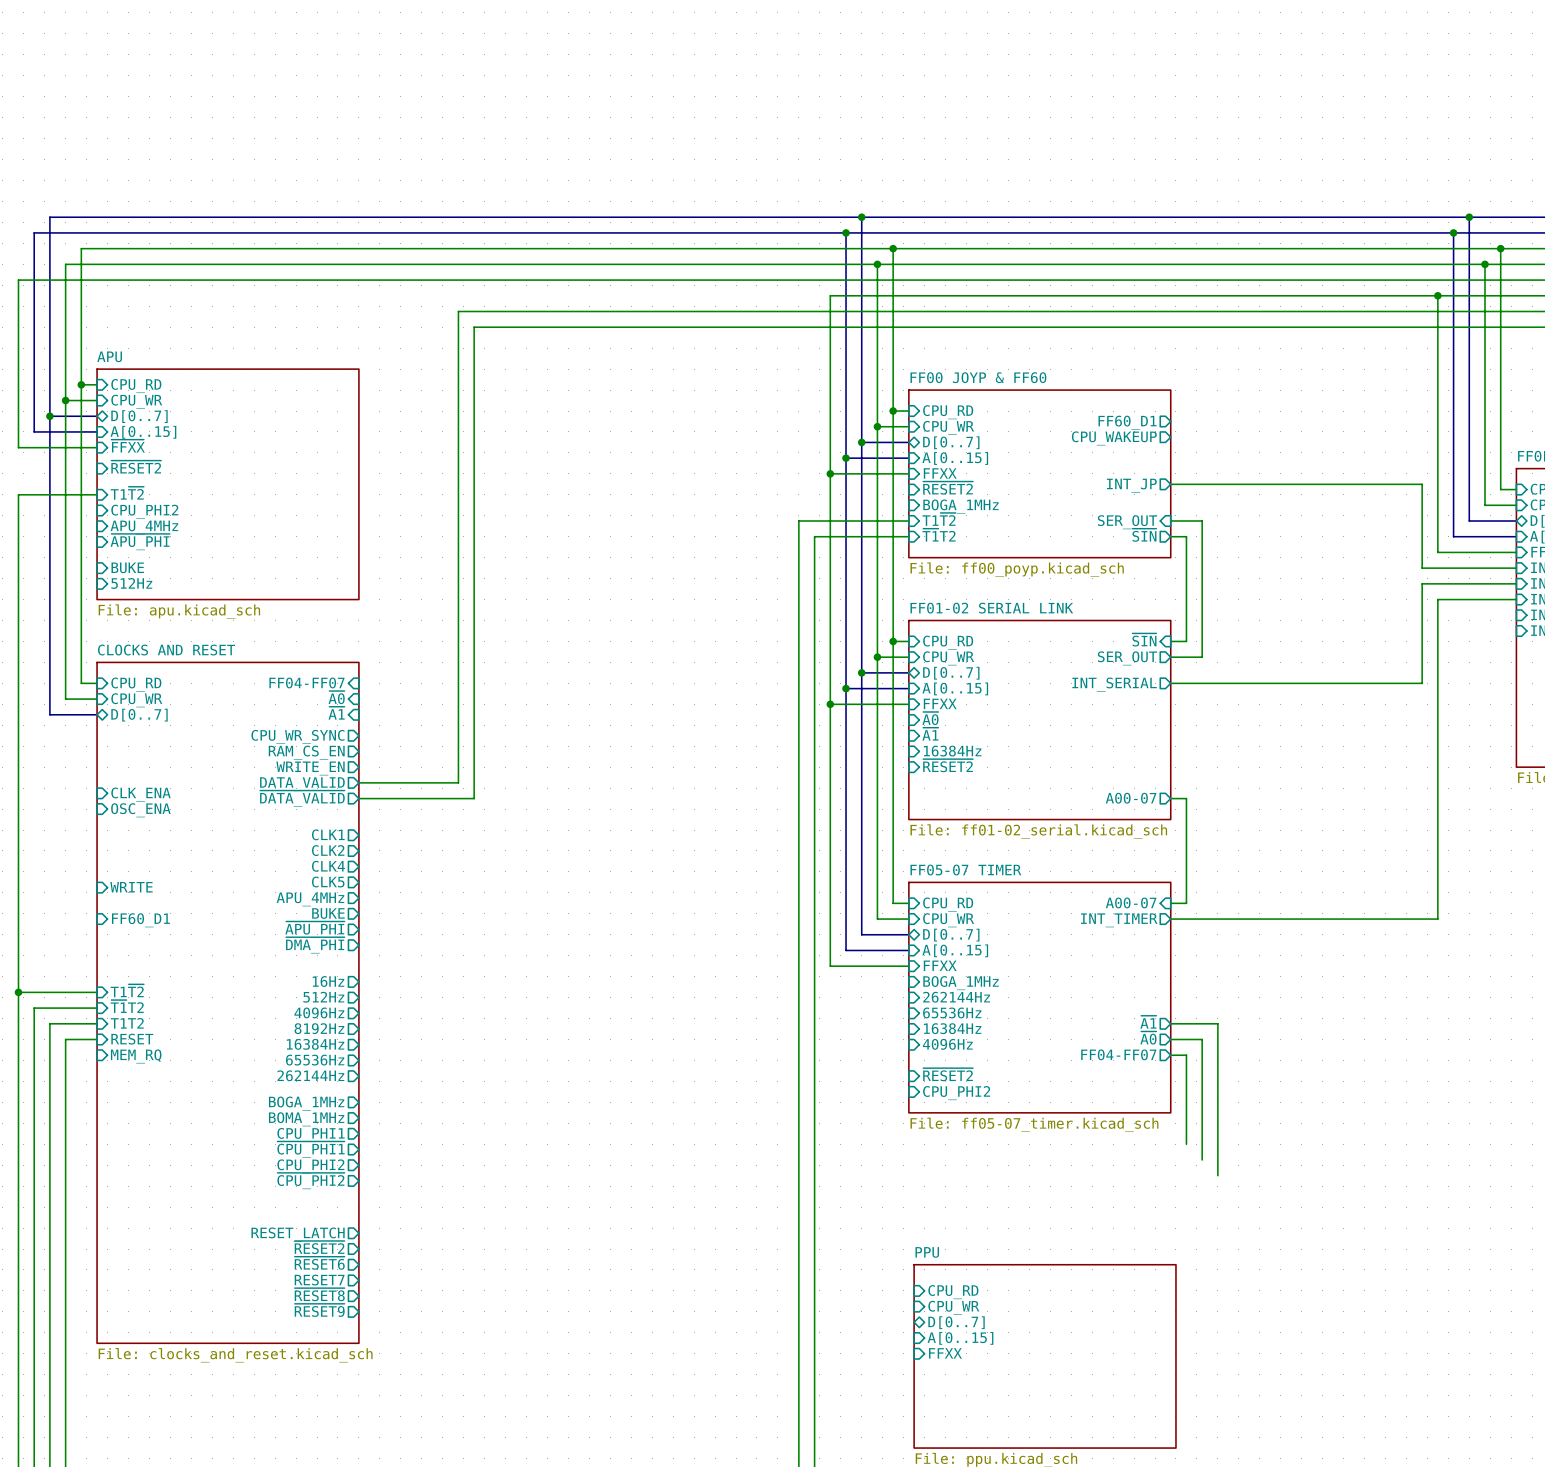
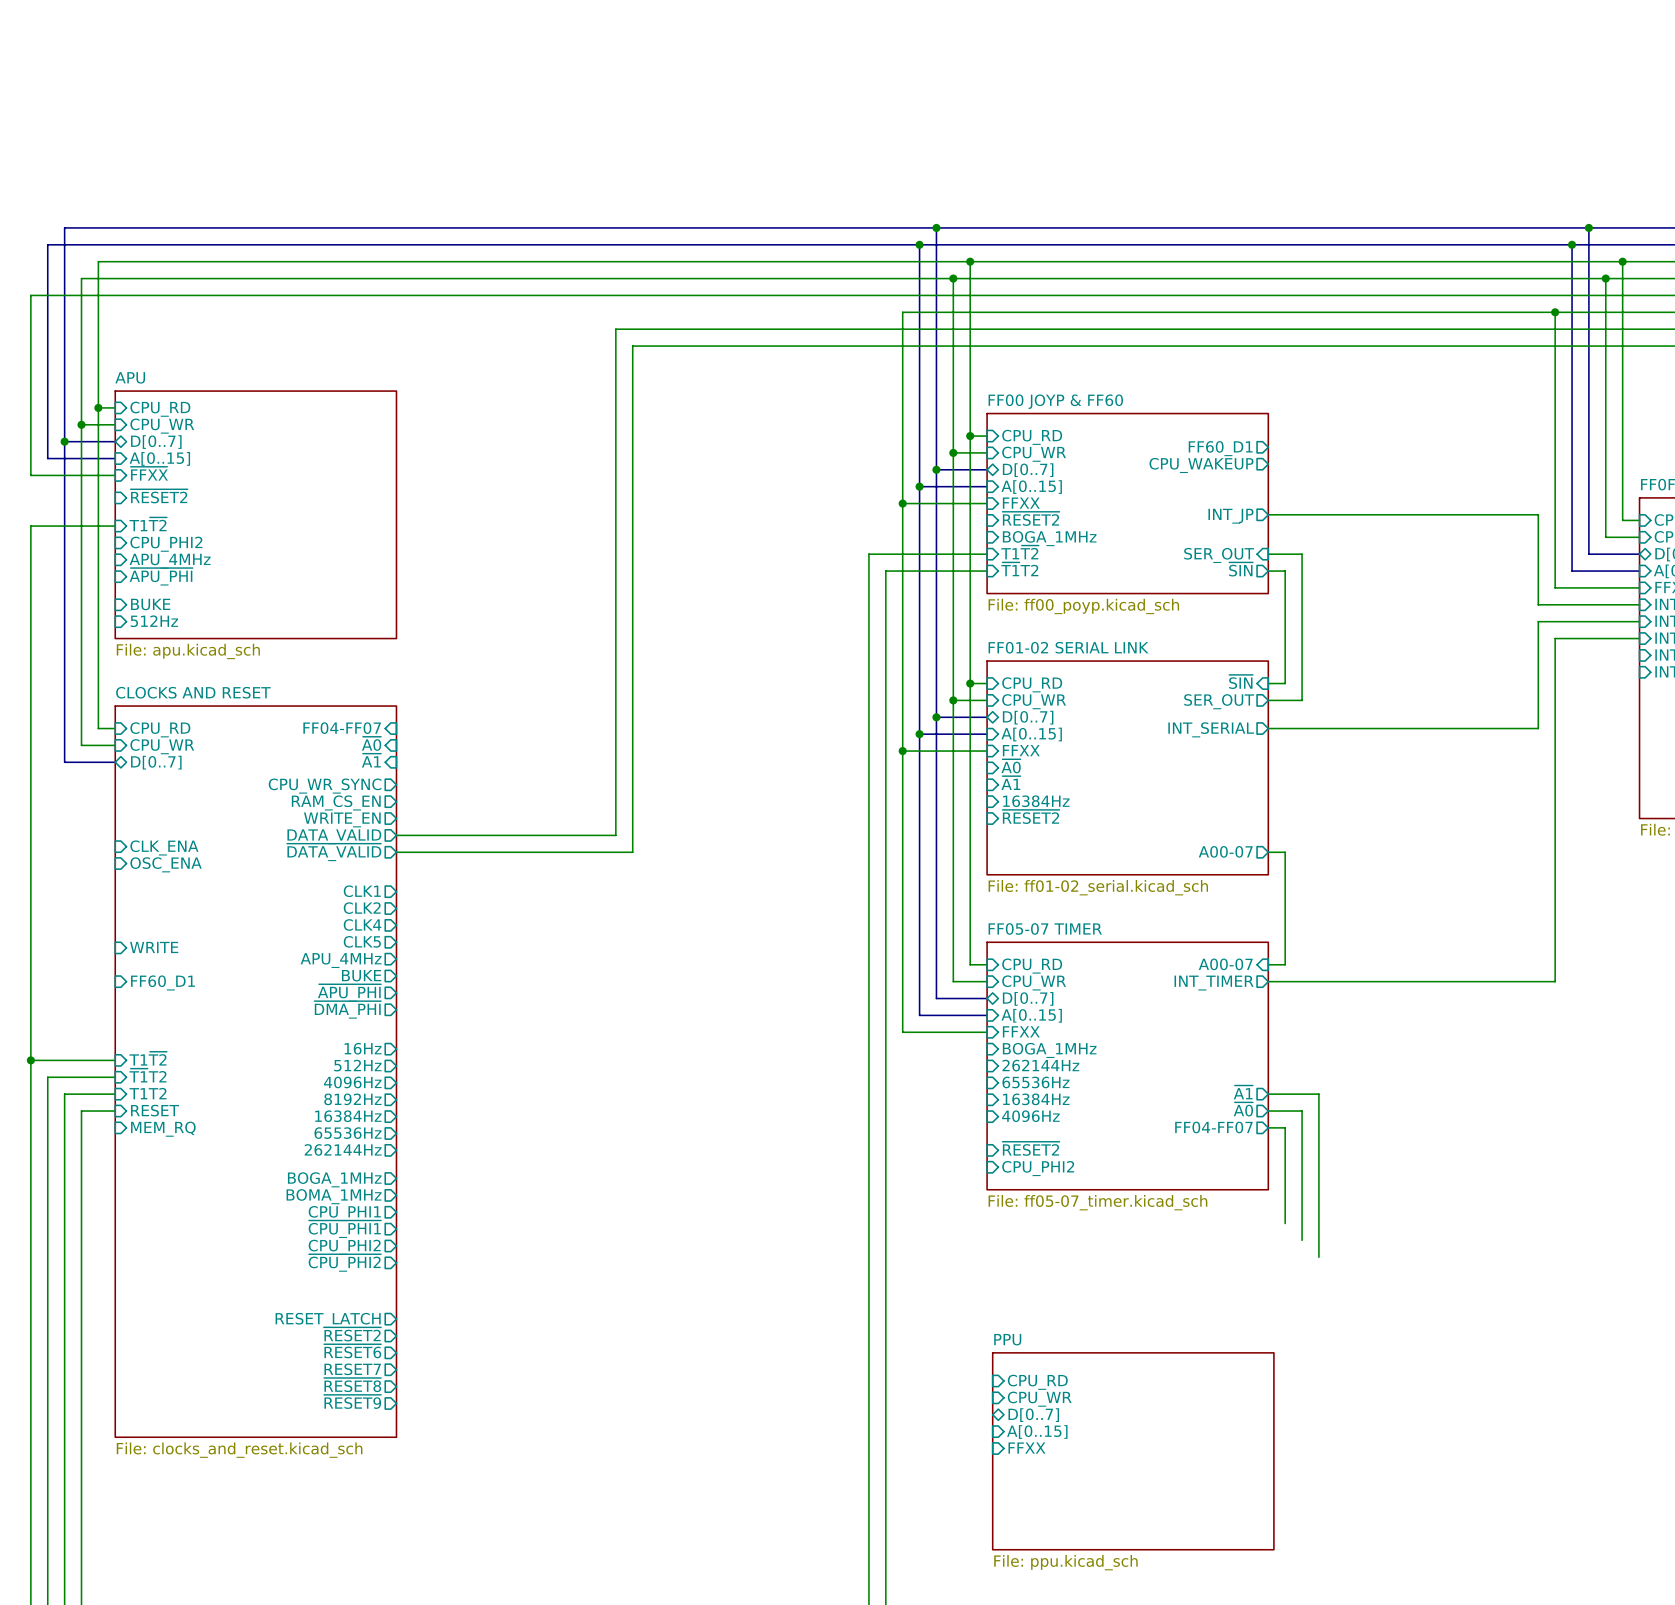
wire: (563, 311) (458, 311) (458, 782) -> (615, 329) (615, 835) (503, 835)
wire: (578, 327) (474, 327) (474, 798) -> (632, 346) (632, 852) (520, 852)

